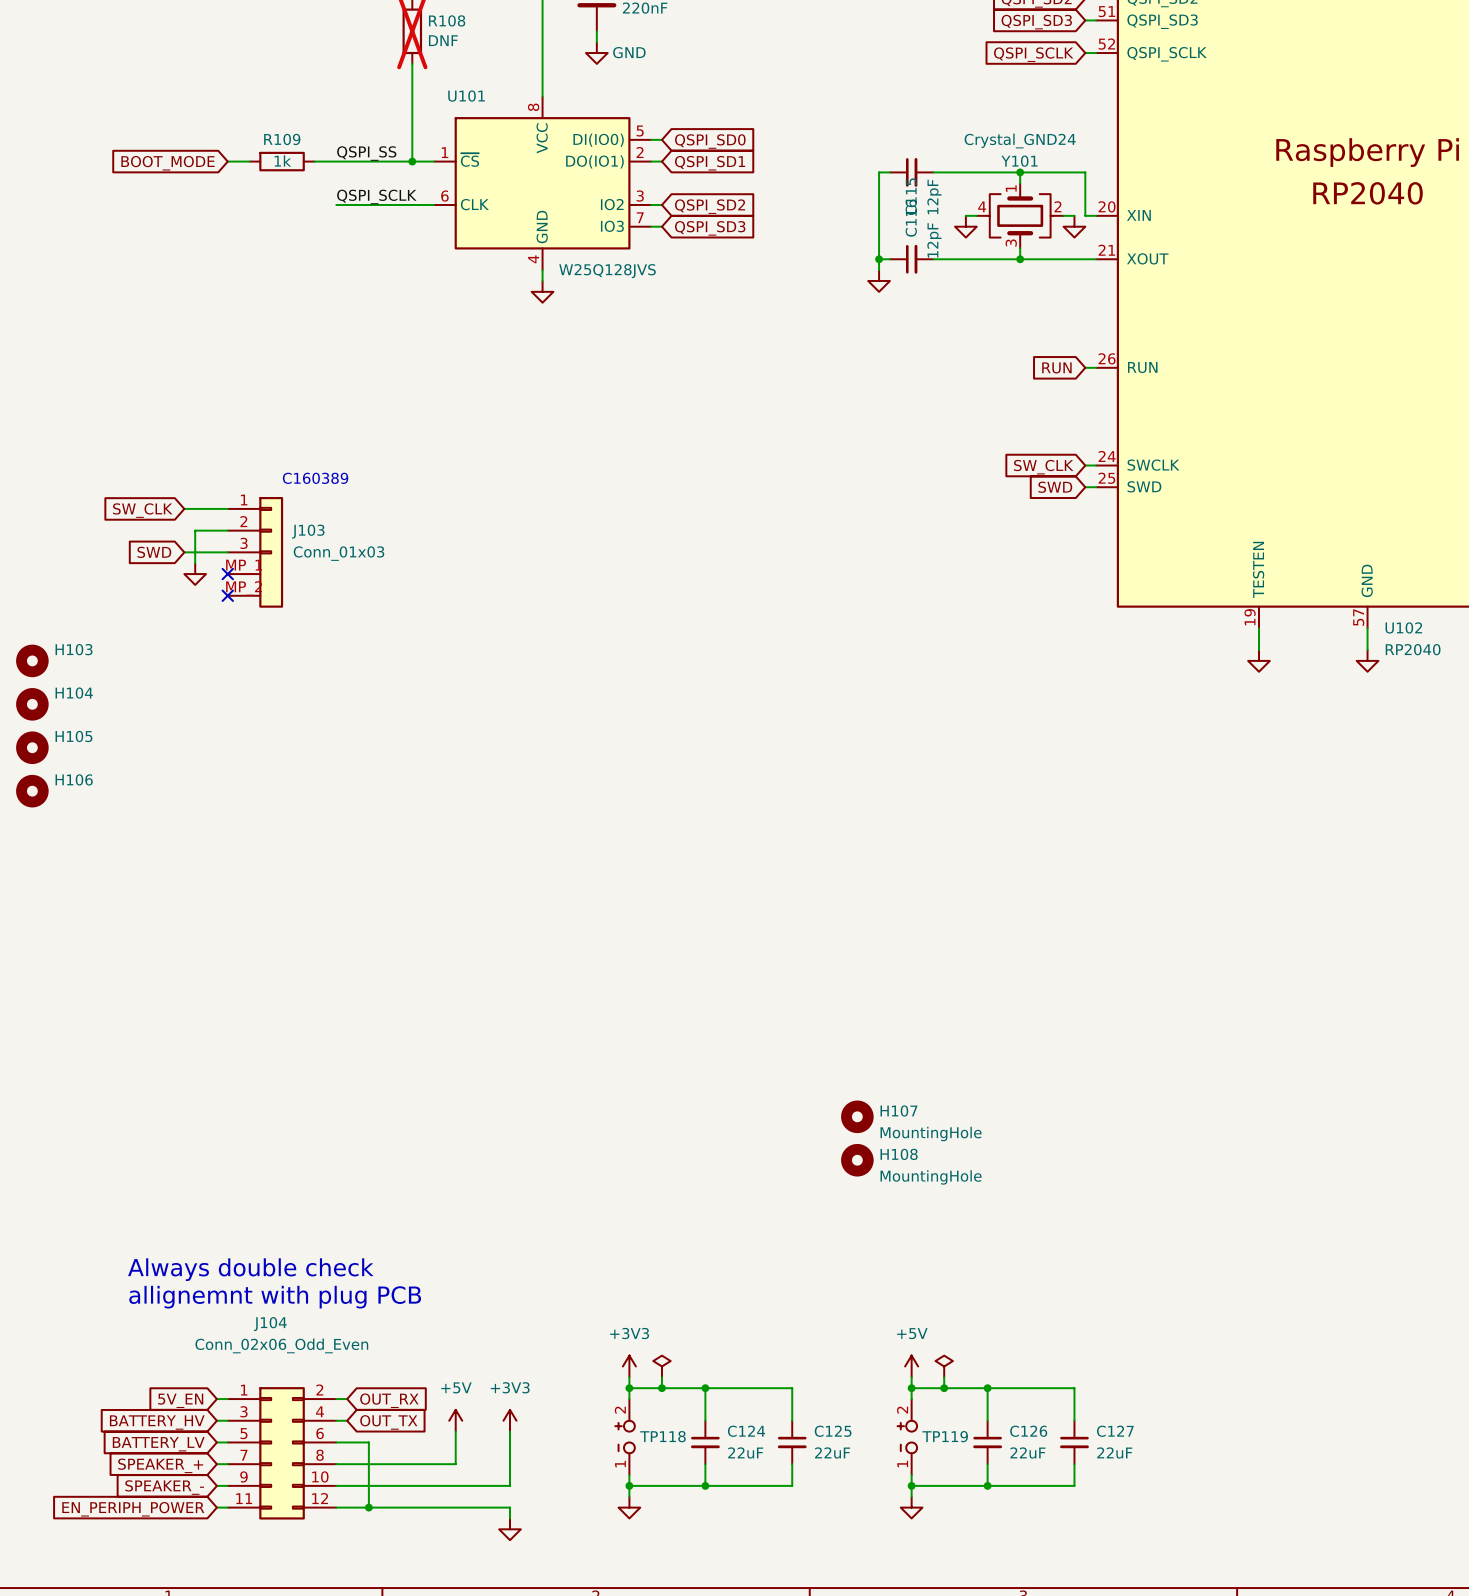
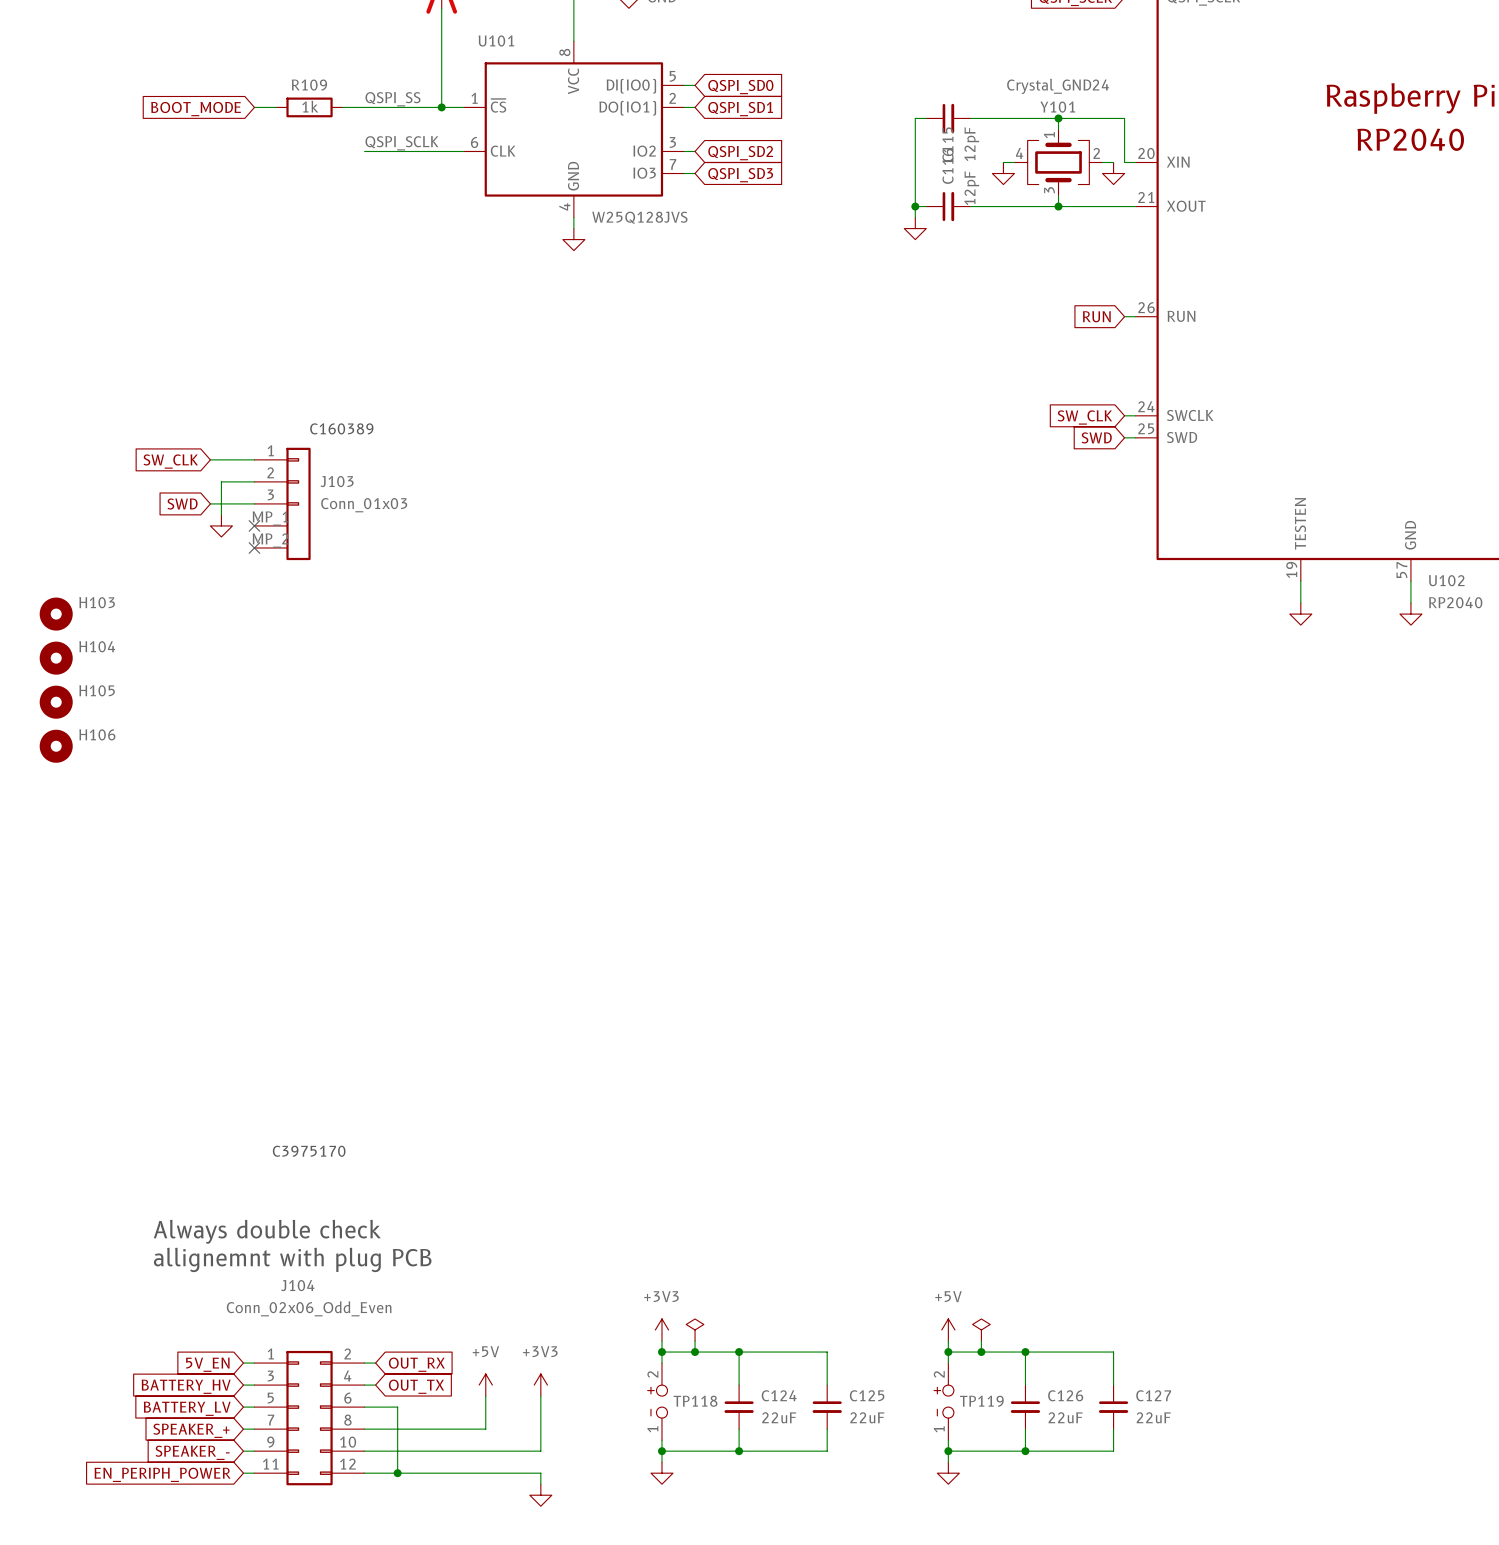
H107: MountingHole (857, 1116) -> none
H108: MountingHole (857, 1160) -> none
text: none -> C3975170 (309, 1151)

